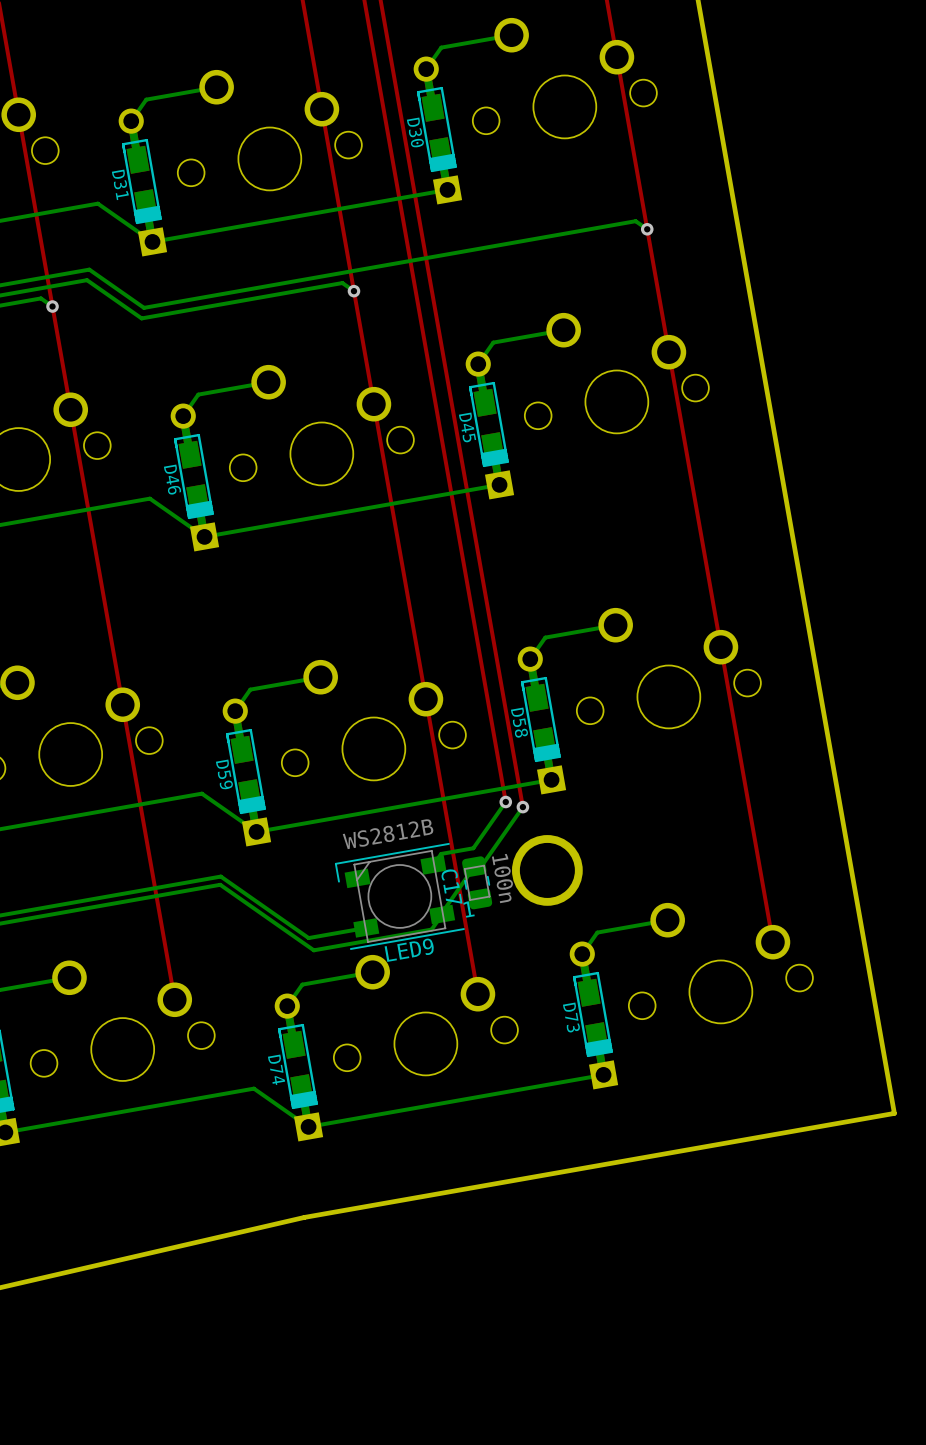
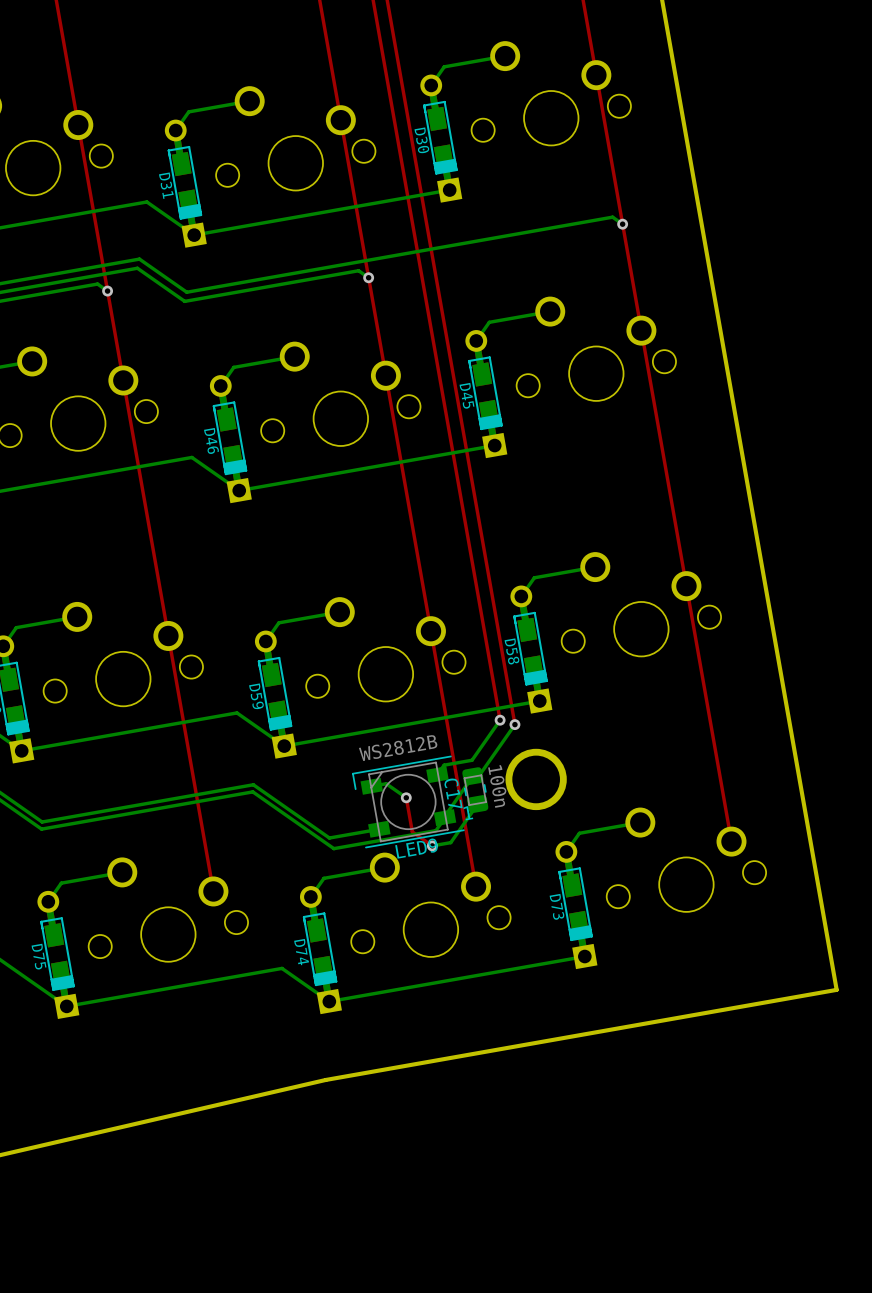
bottom track: none -> (371, 786) (386, 783) (406, 797)
top track: none -> (406, 797) (412, 831) (432, 845)
via: none -> (406, 797)
bottom track: none -> (477, 804) (450, 842) (432, 845)
via: none -> (432, 845)

